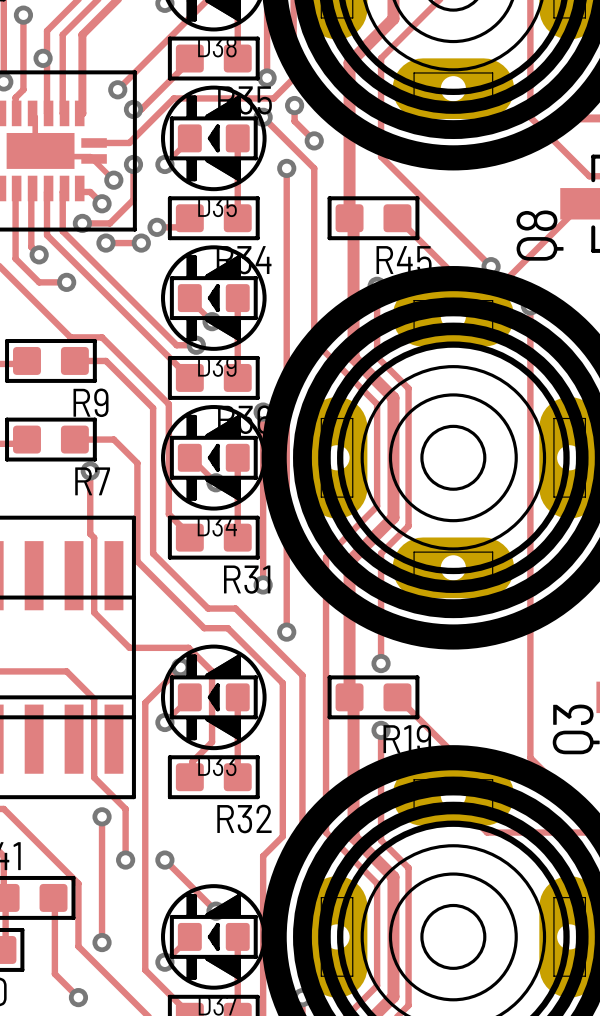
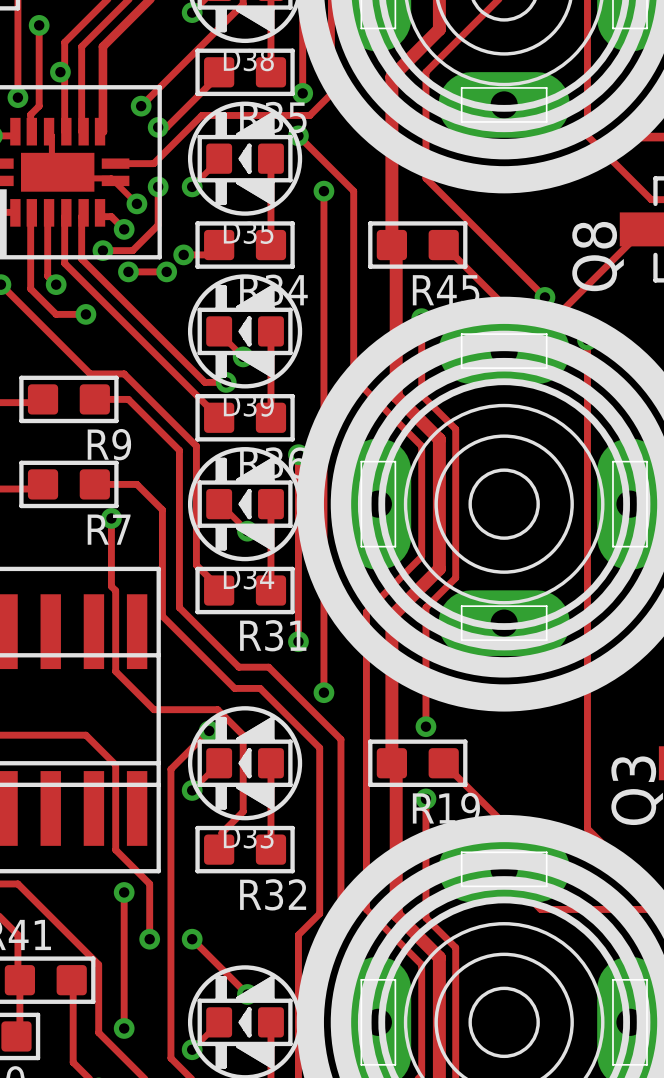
track: (294, 105) (294, 121) (314, 140) -> none
via: (294, 105) -> none
via: (314, 140) -> none

